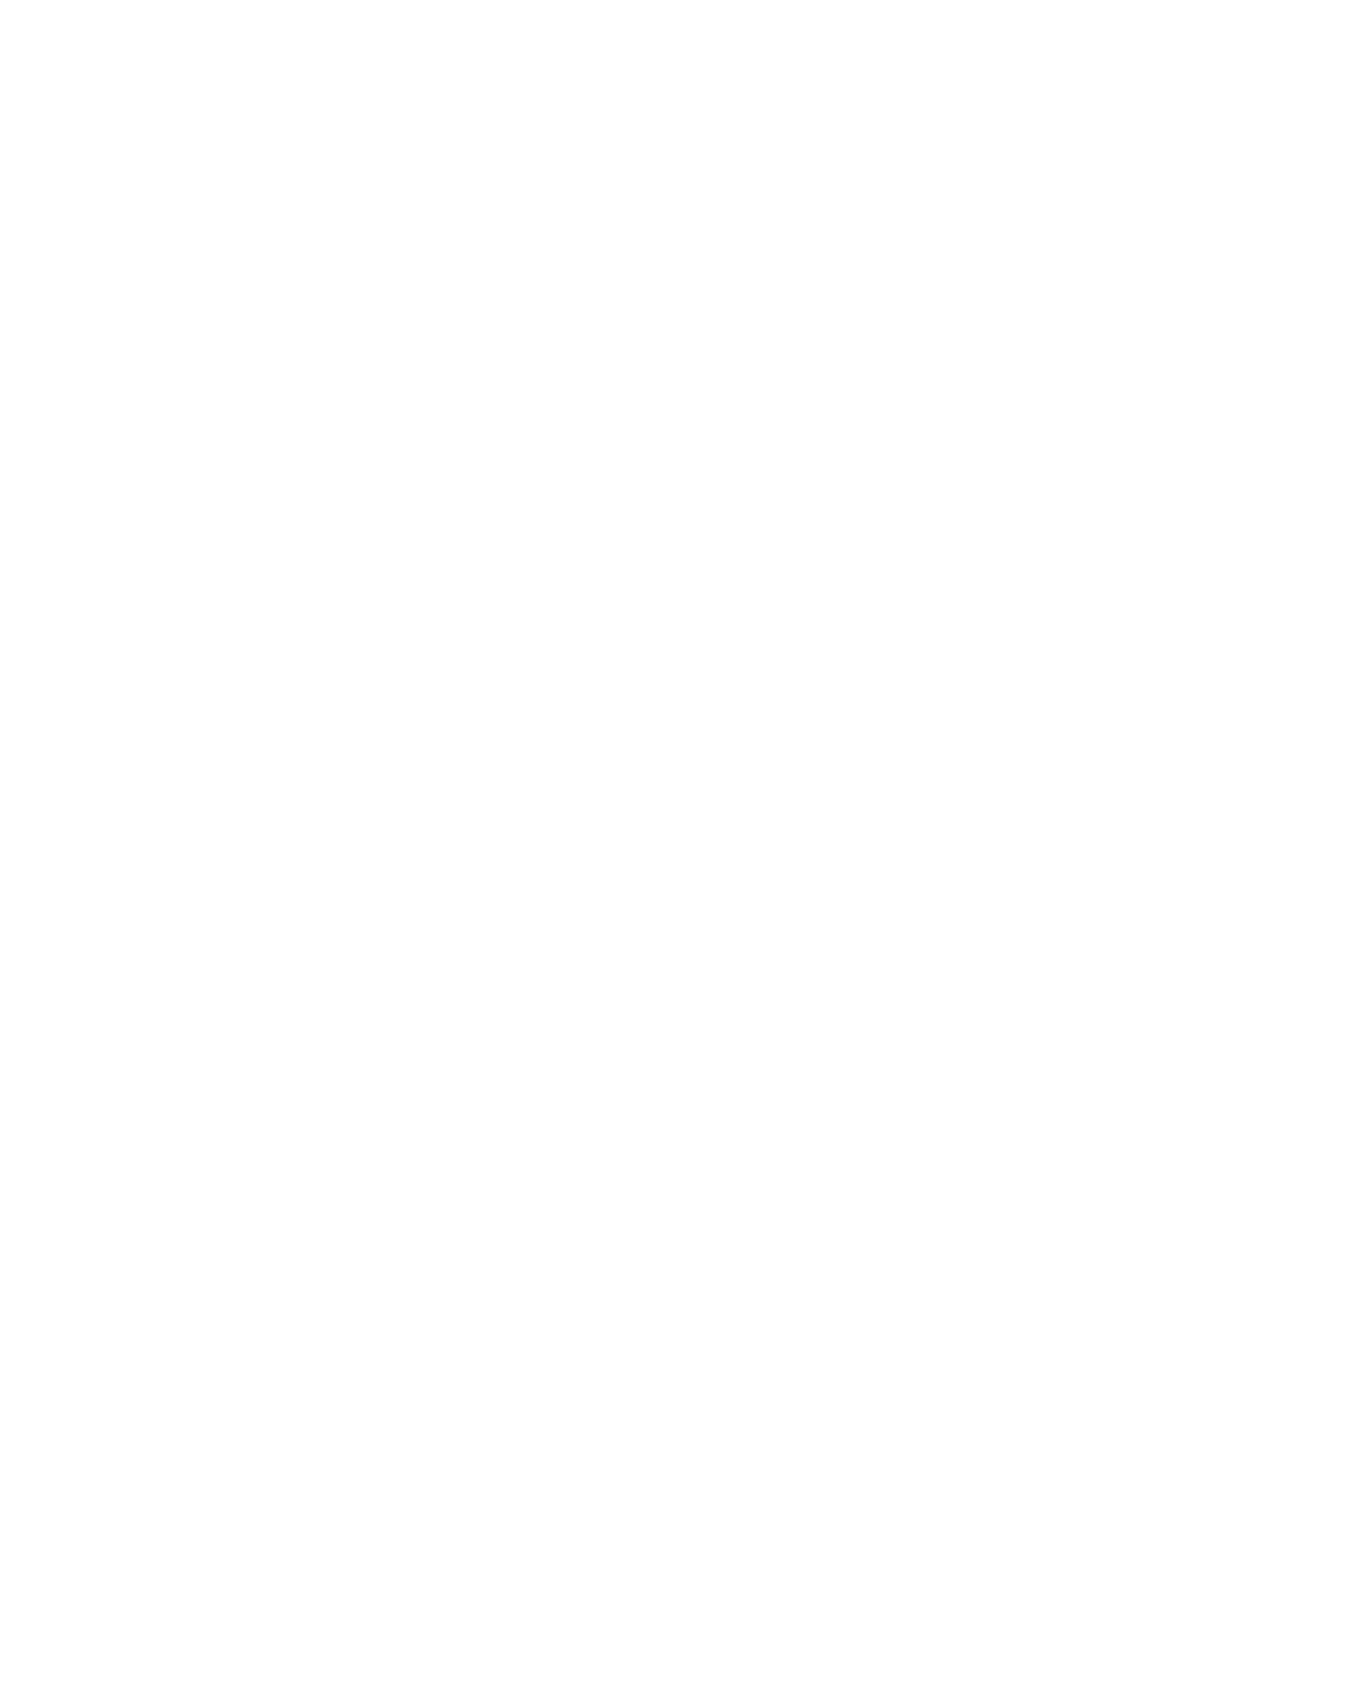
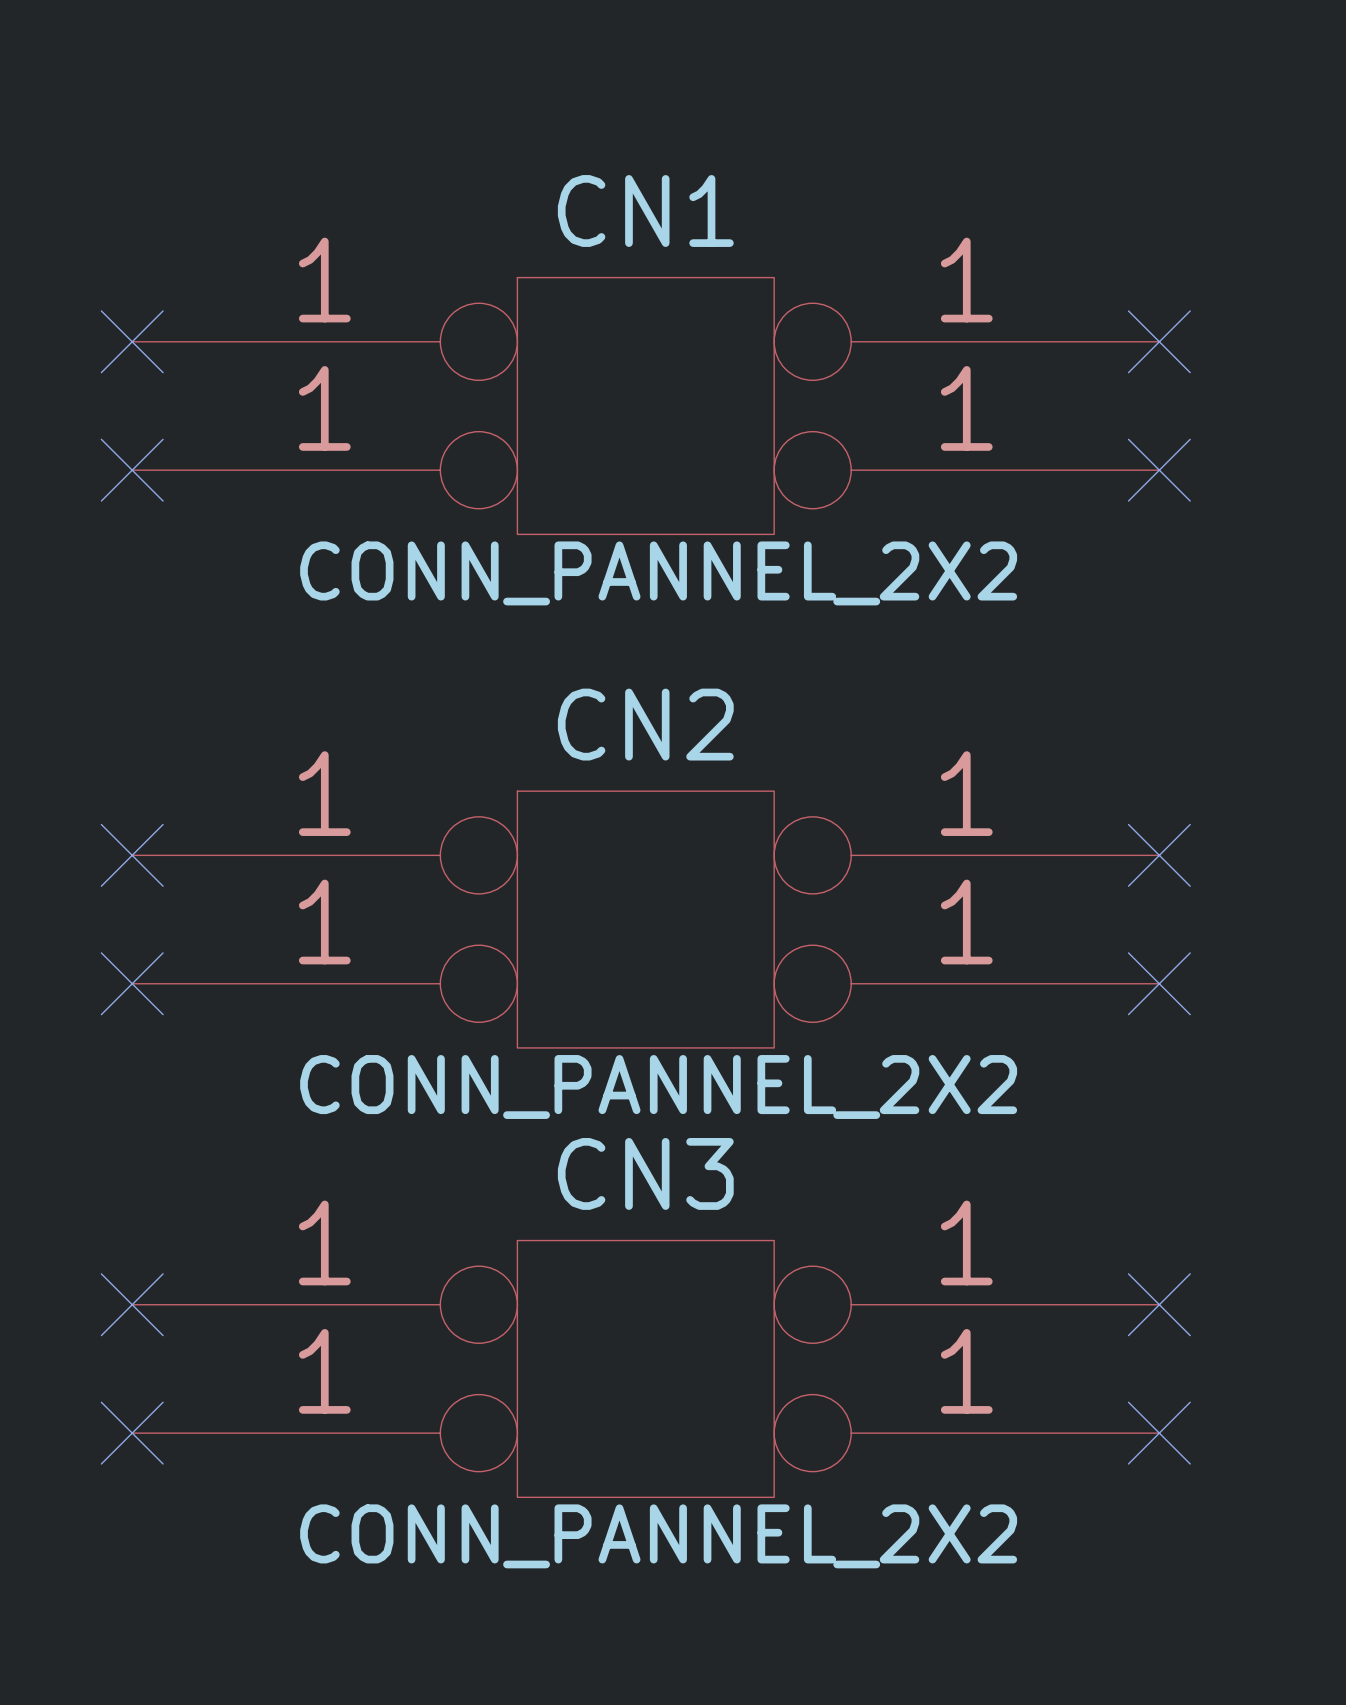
no-connect mark: none -> (132, 341)
no-connect mark: none -> (1159, 341)
CN1: none -> CONN_PANNEL_2X2 (645, 405)
no-connect mark: none -> (132, 470)
no-connect mark: none -> (1159, 470)
no-connect mark: none -> (132, 855)
no-connect mark: none -> (1159, 855)
CN2: none -> CONN_PANNEL_2X2 (645, 919)
no-connect mark: none -> (132, 983)
no-connect mark: none -> (1159, 983)
no-connect mark: none -> (132, 1304)
no-connect mark: none -> (1159, 1304)
CN3: none -> CONN_PANNEL_2X2 (645, 1368)
no-connect mark: none -> (132, 1433)
no-connect mark: none -> (1159, 1433)

